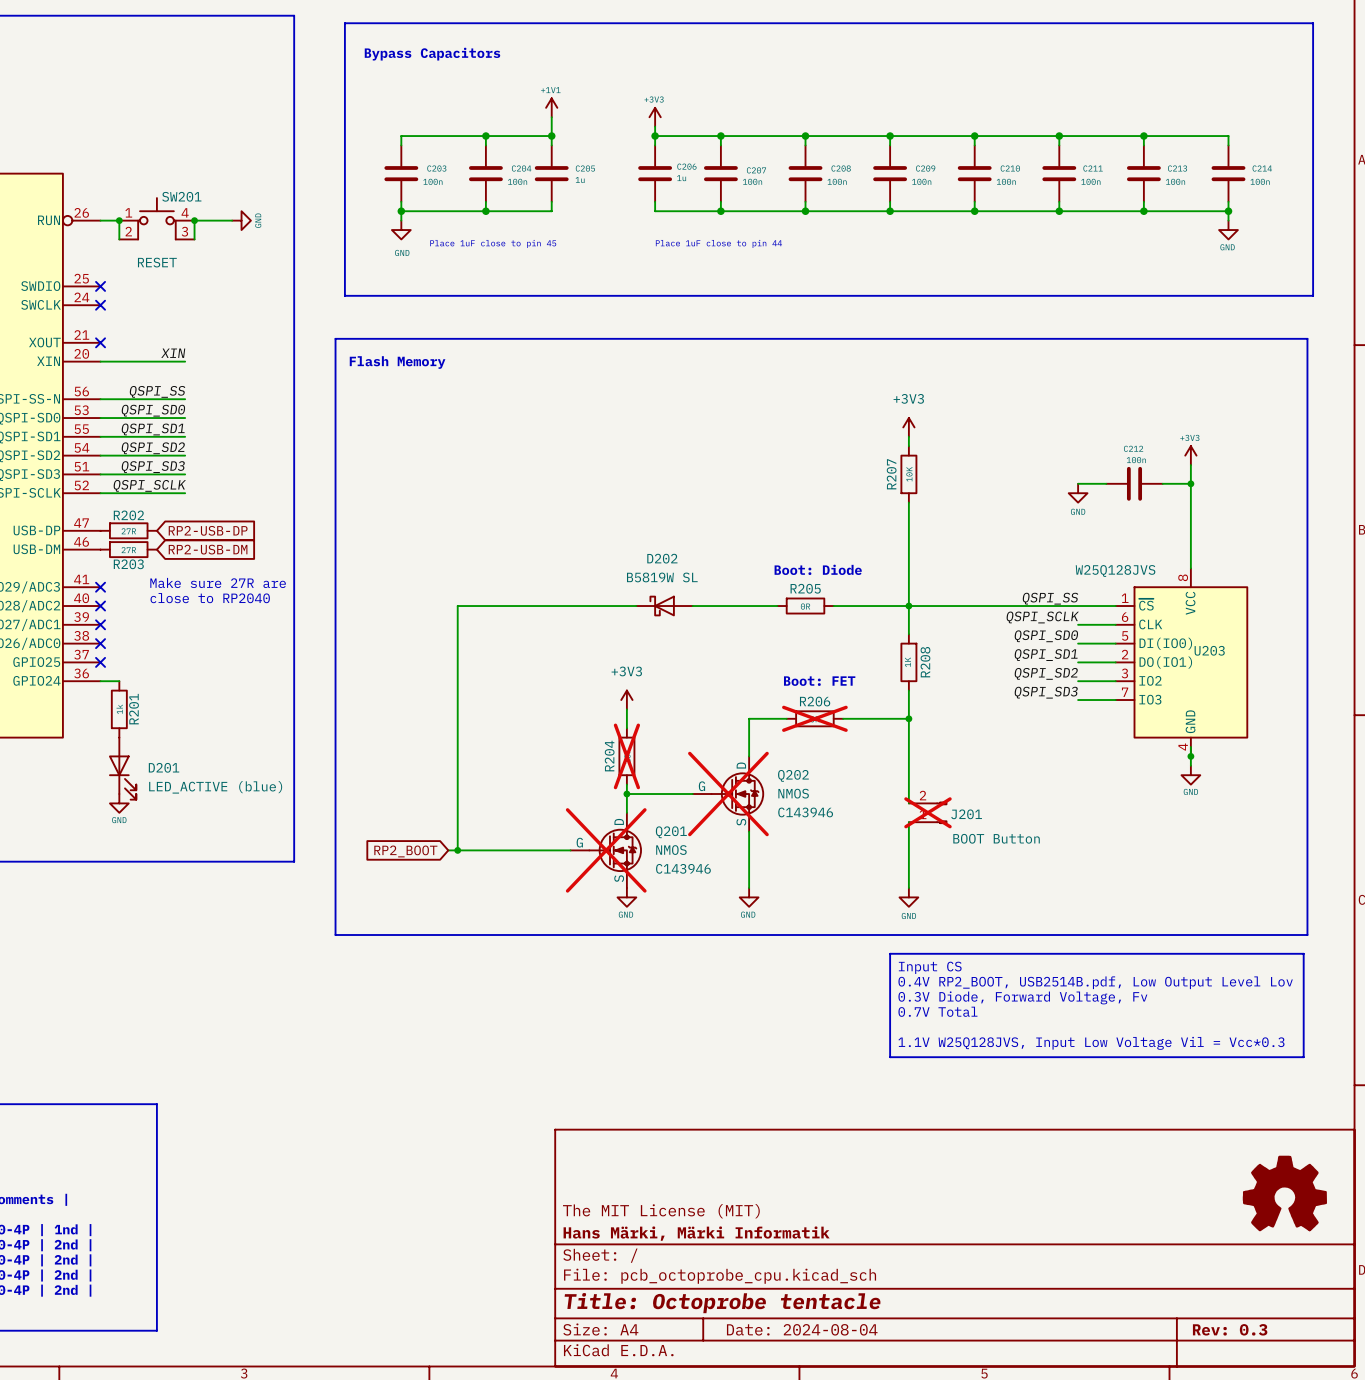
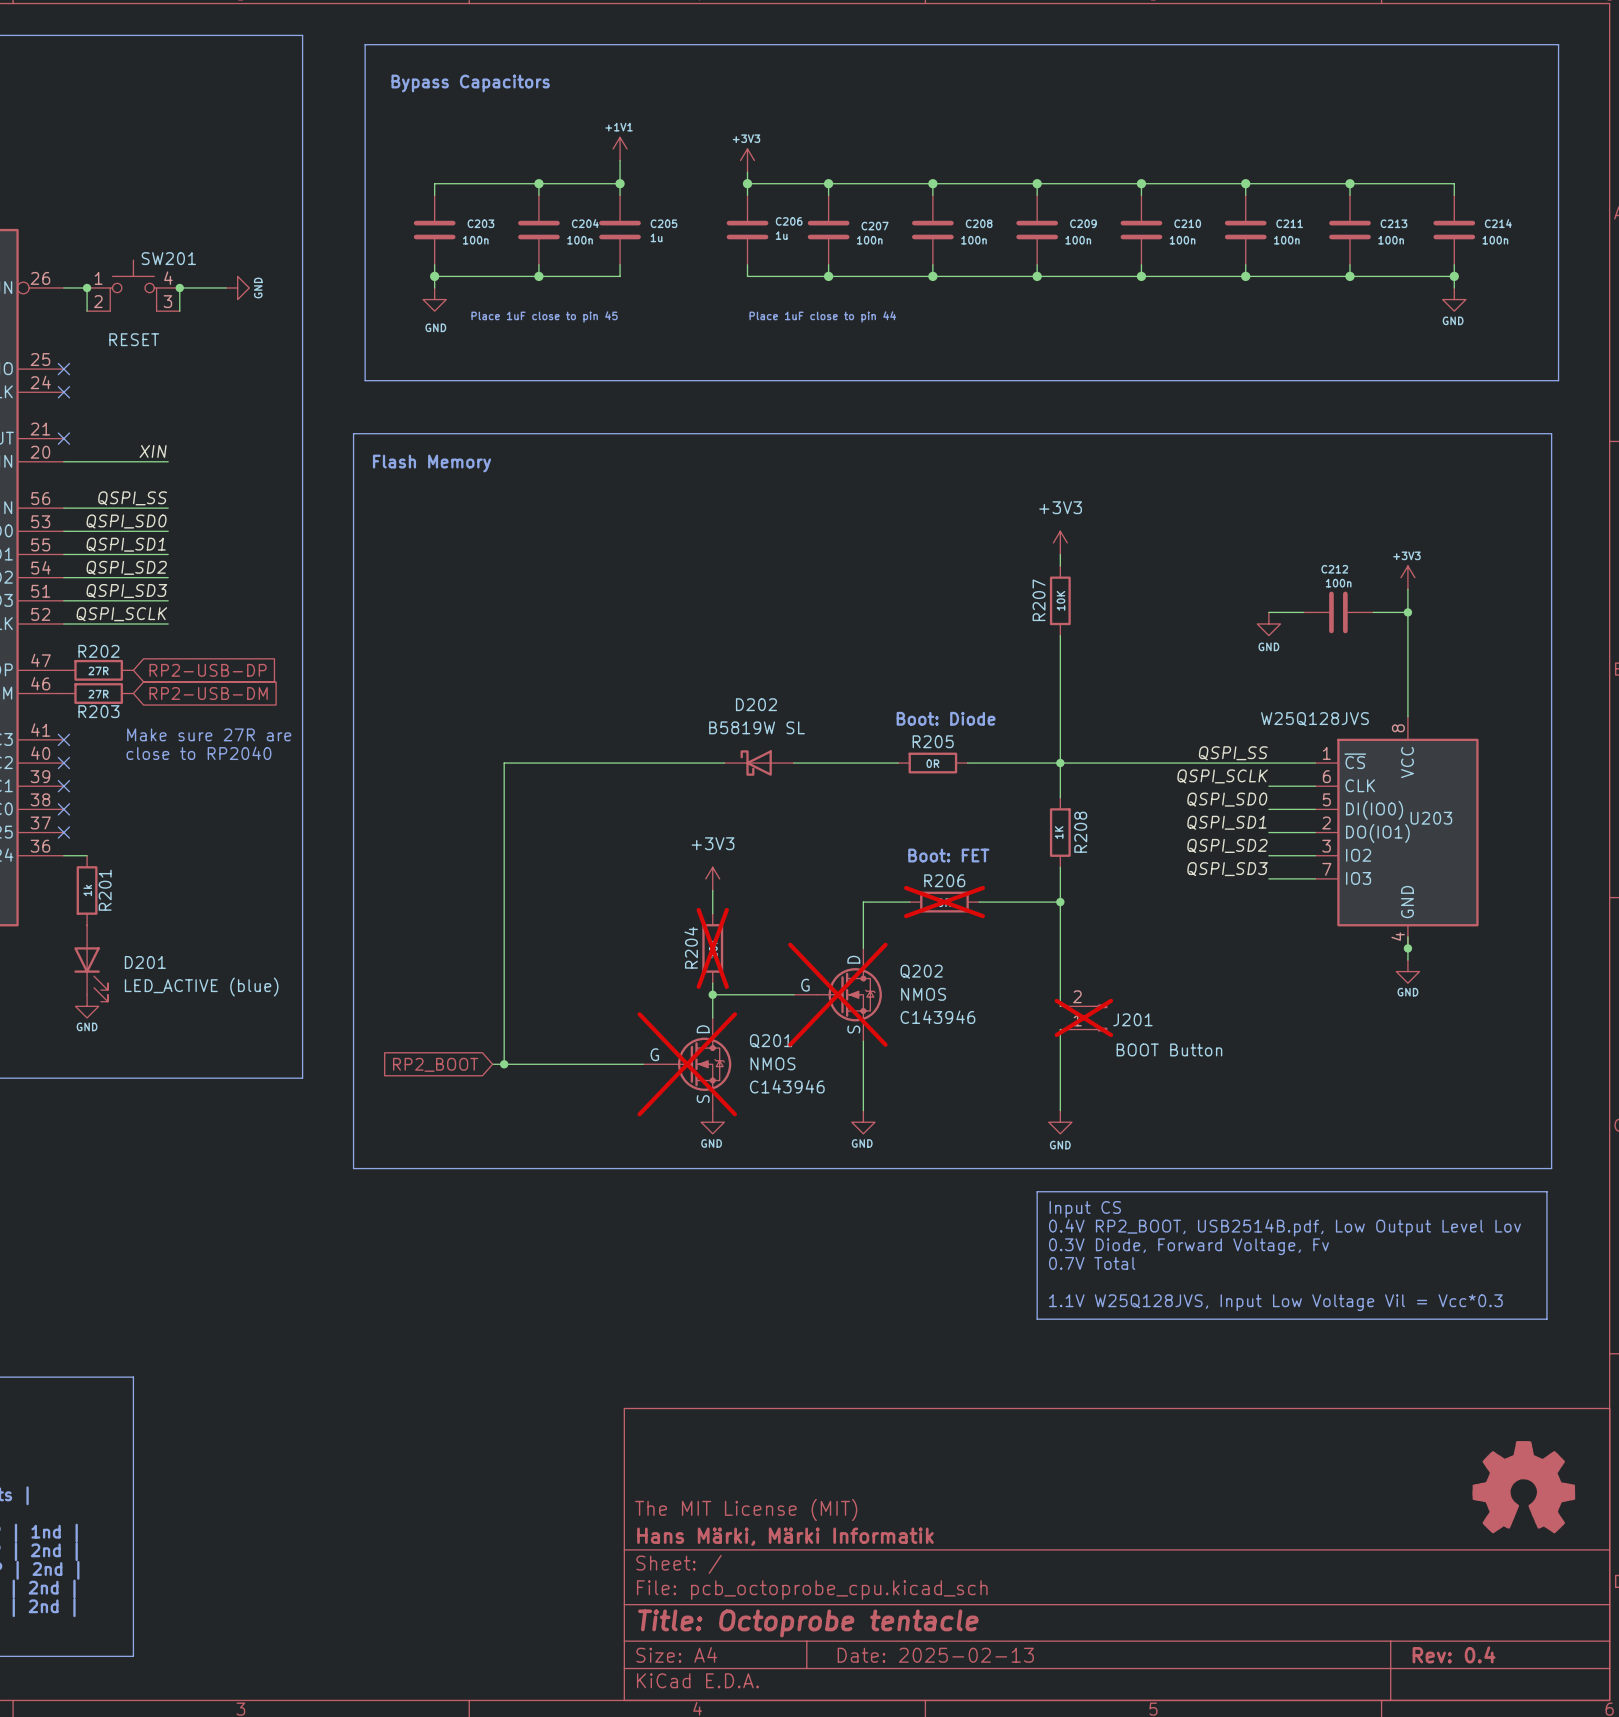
title block: Date: 2024-08-04 (802, 1329) -> Date: 2025-02-13 (935, 1655)
title block: Rev: 0.3 (1230, 1329) -> Rev: 0.4 (1454, 1654)

